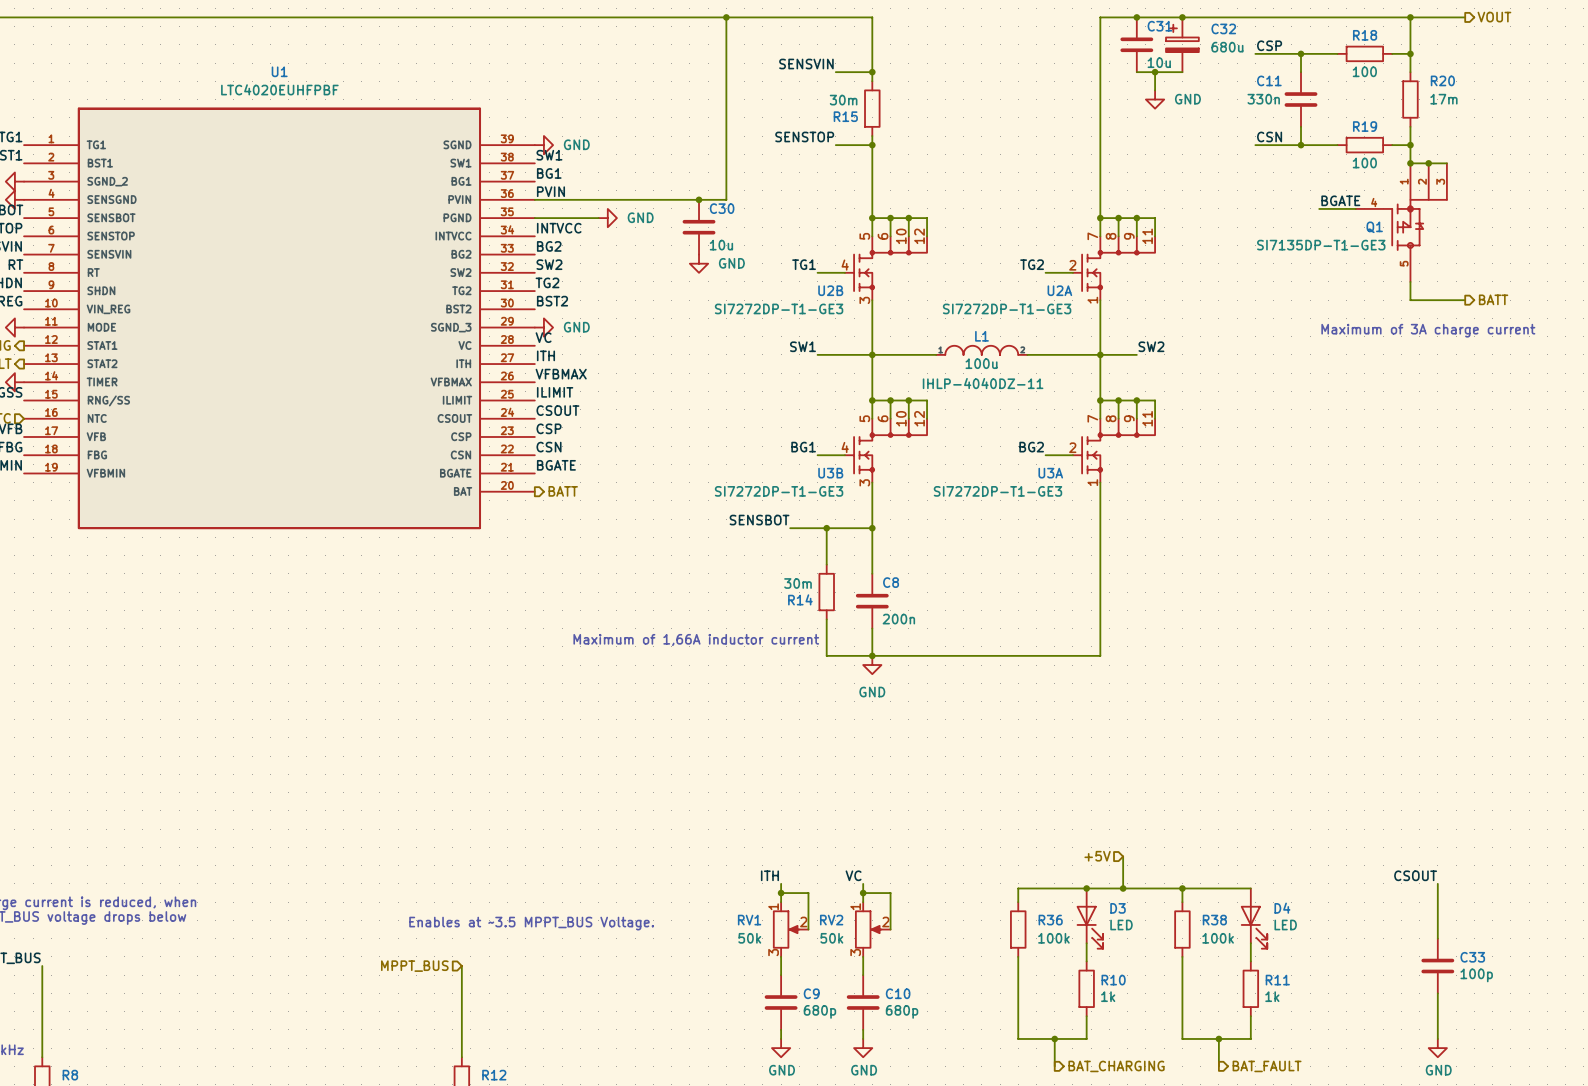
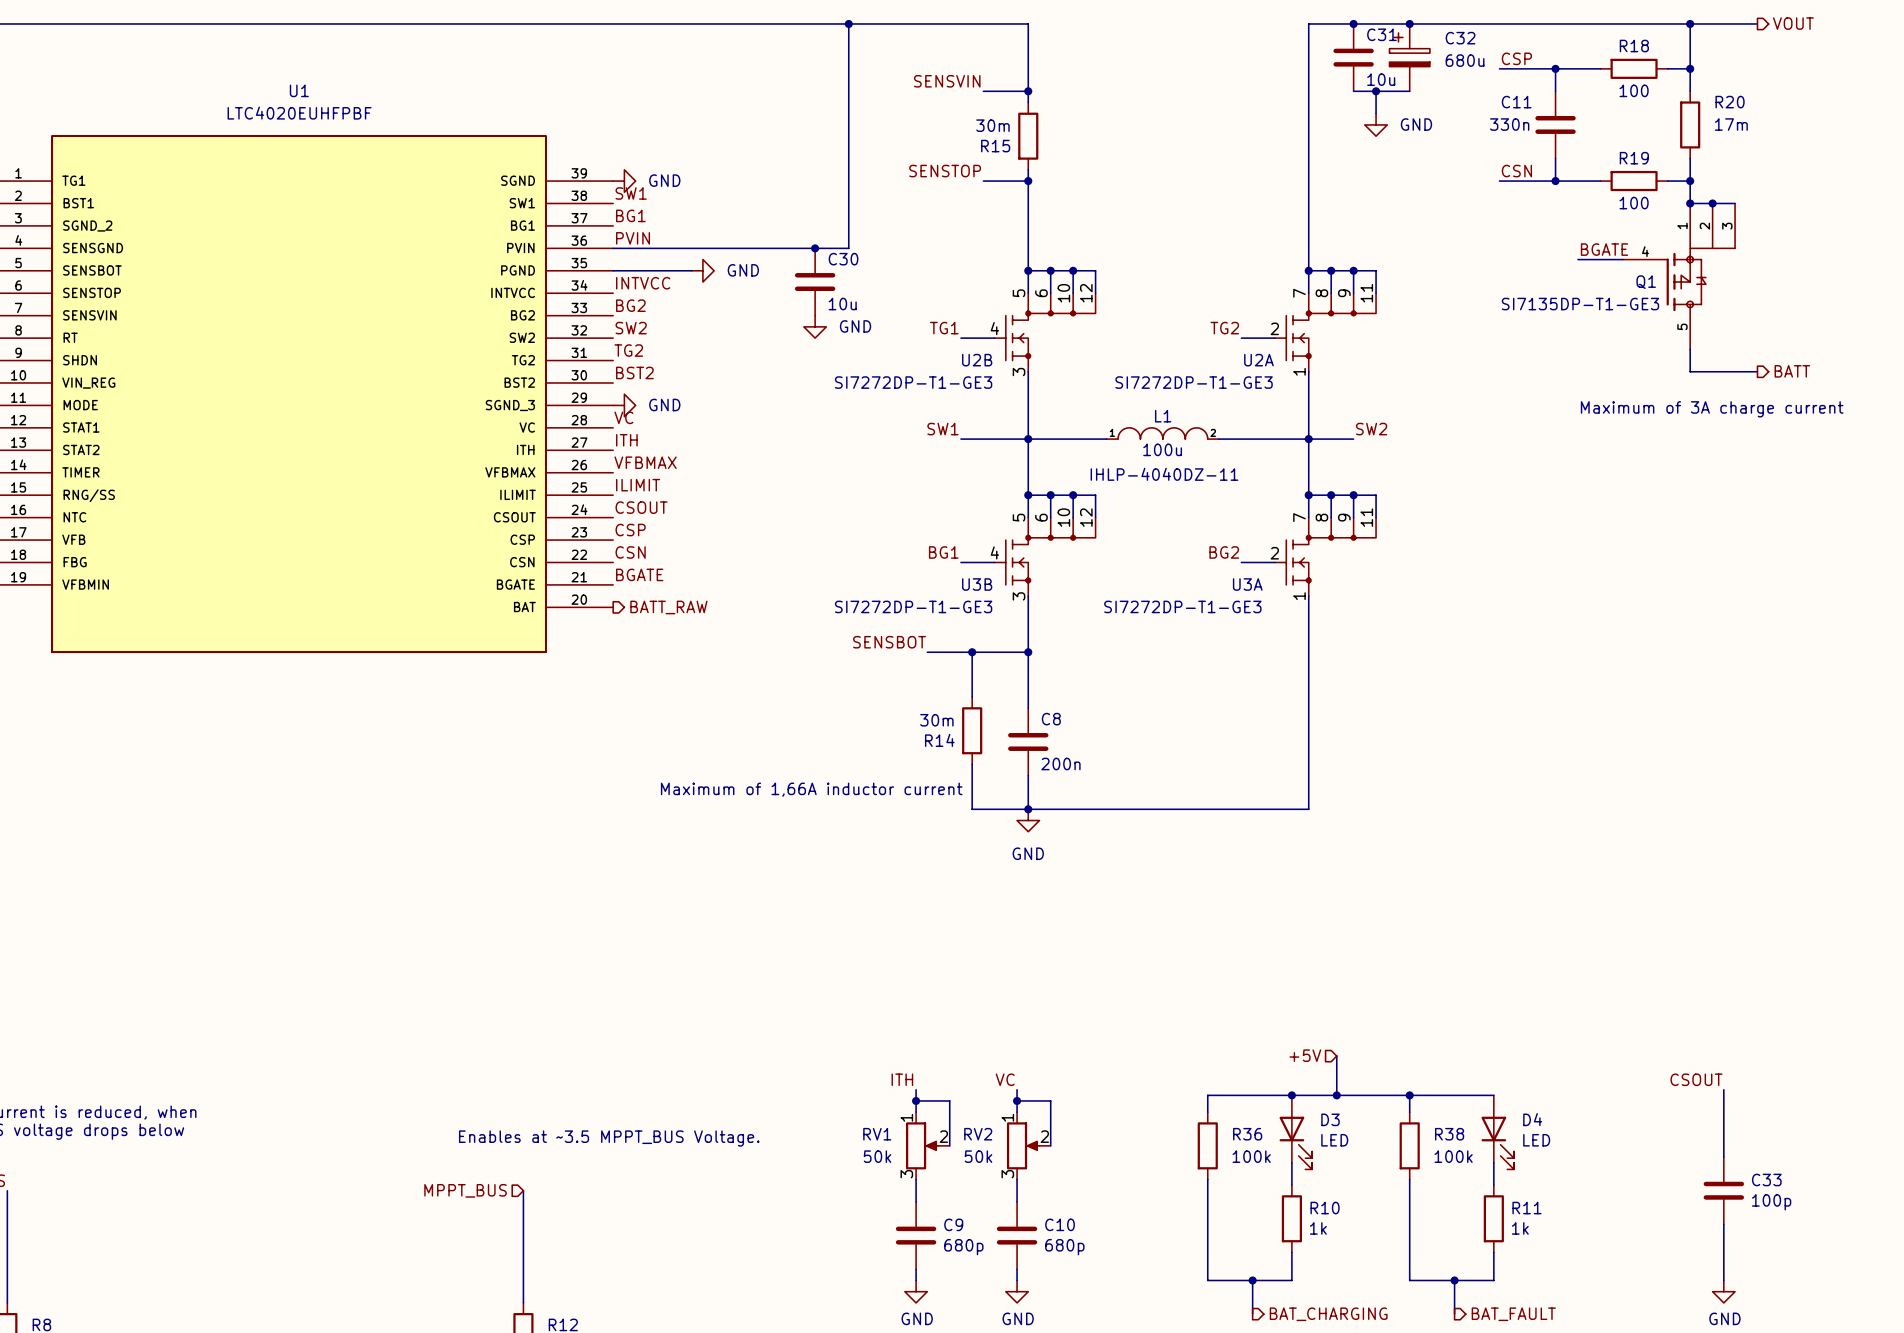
hierarchical label: BATT (563, 491) -> BATT_RAW (668, 607)

